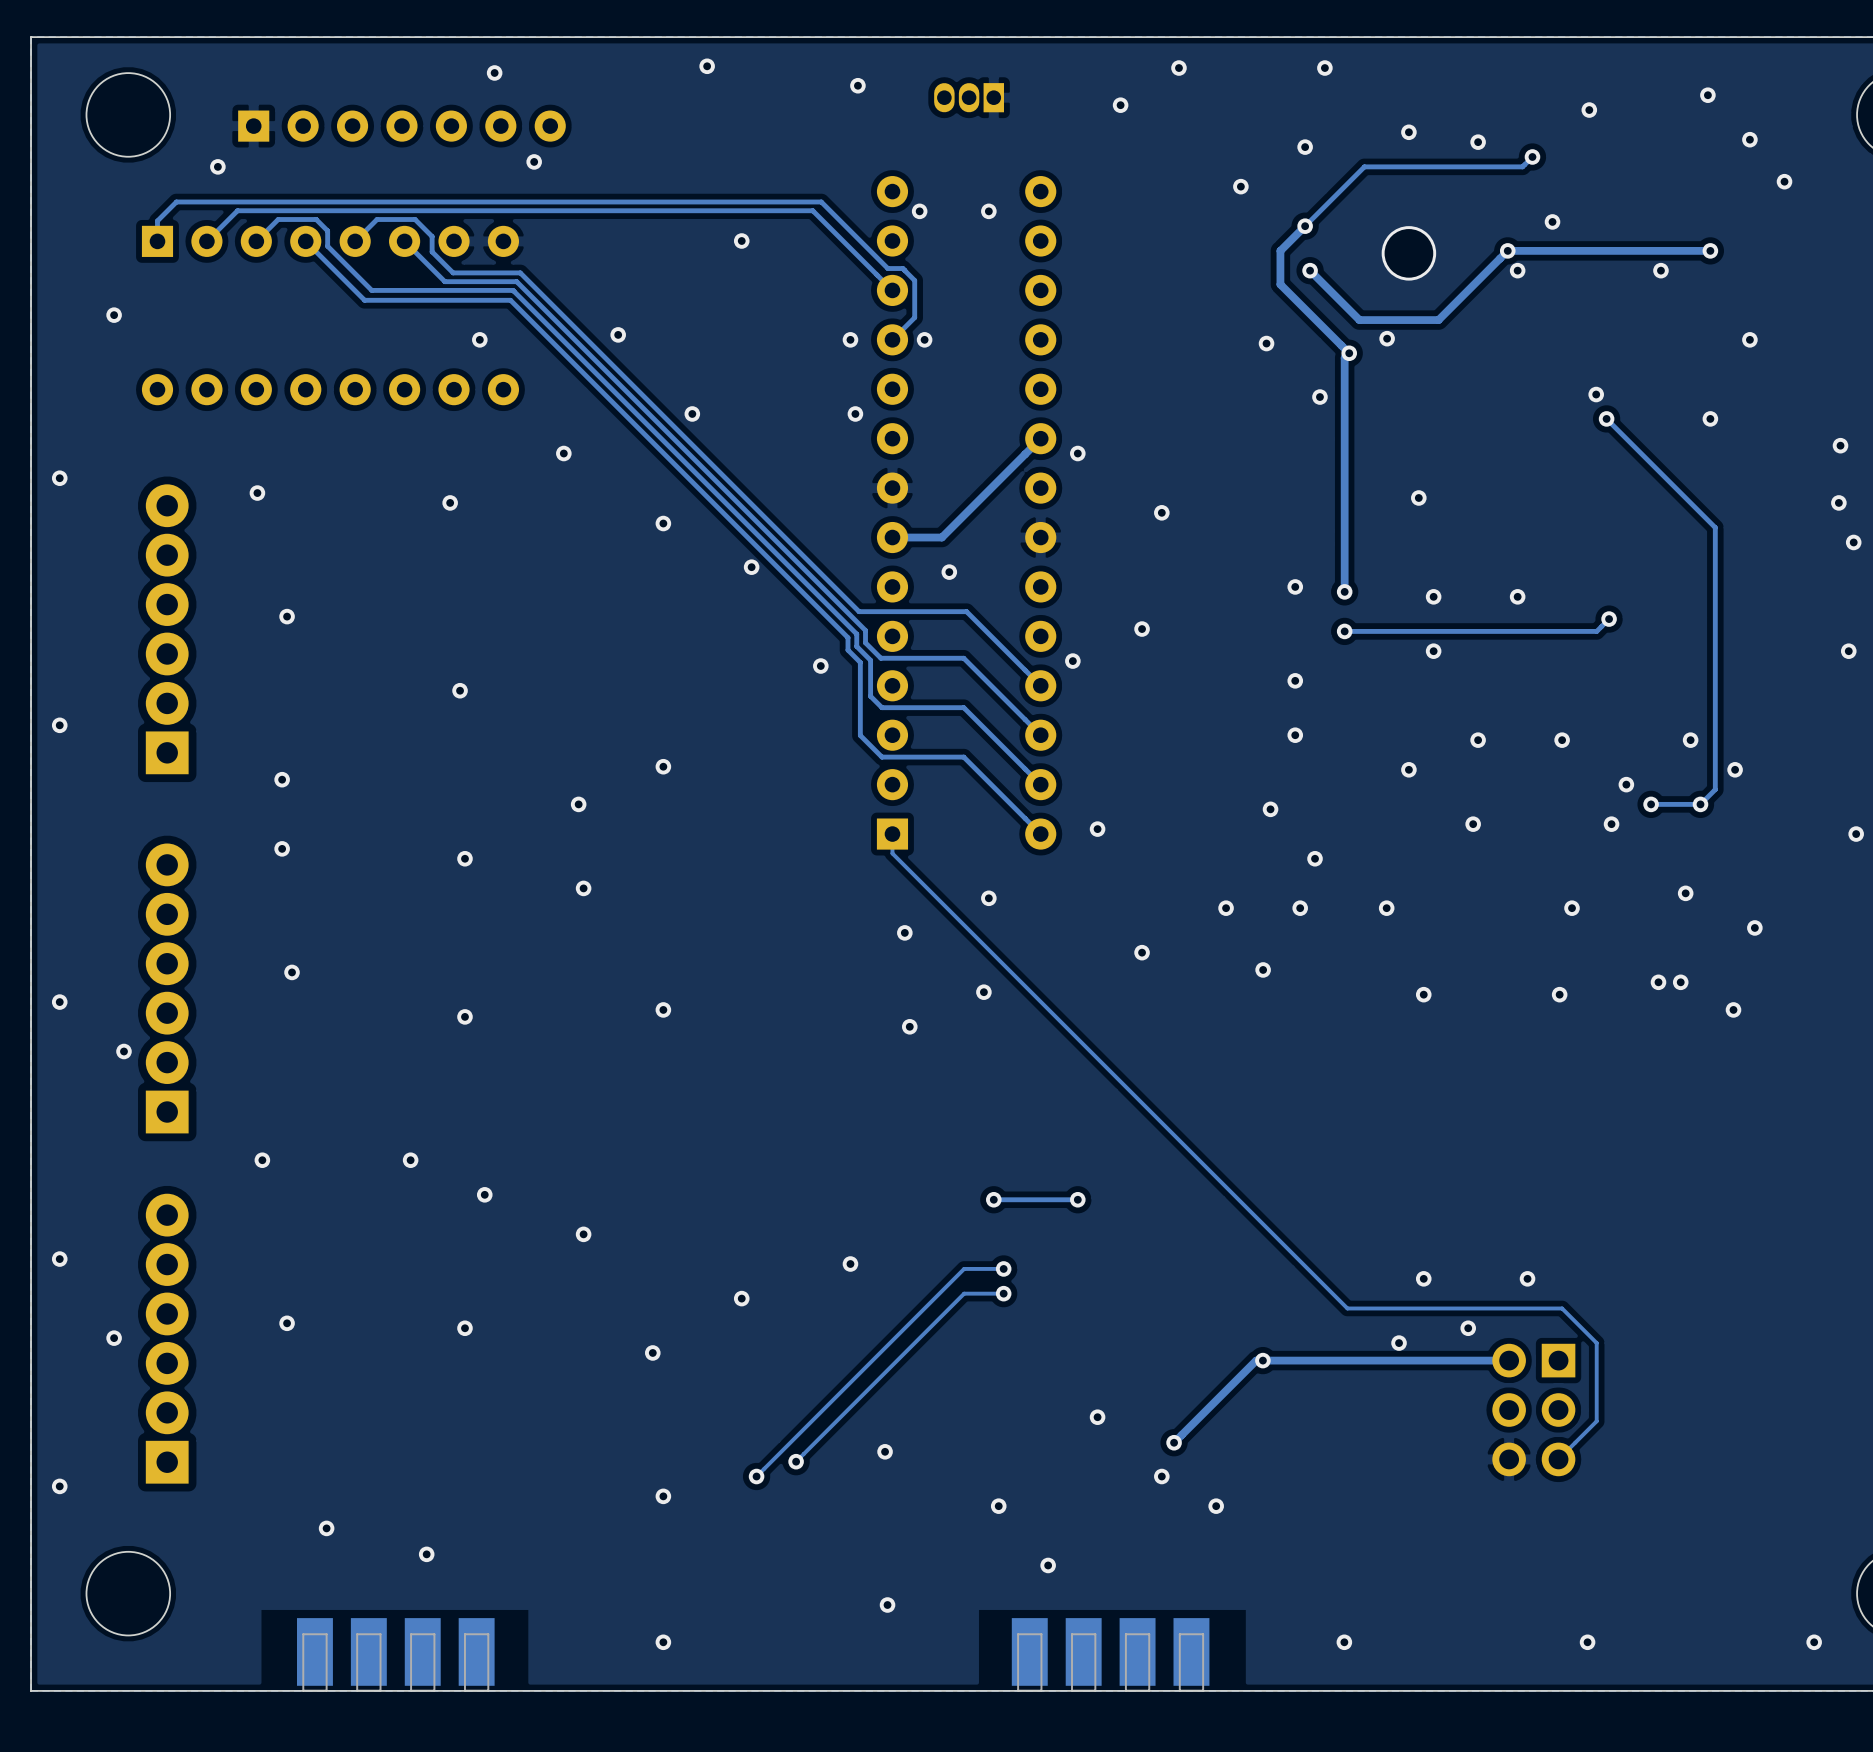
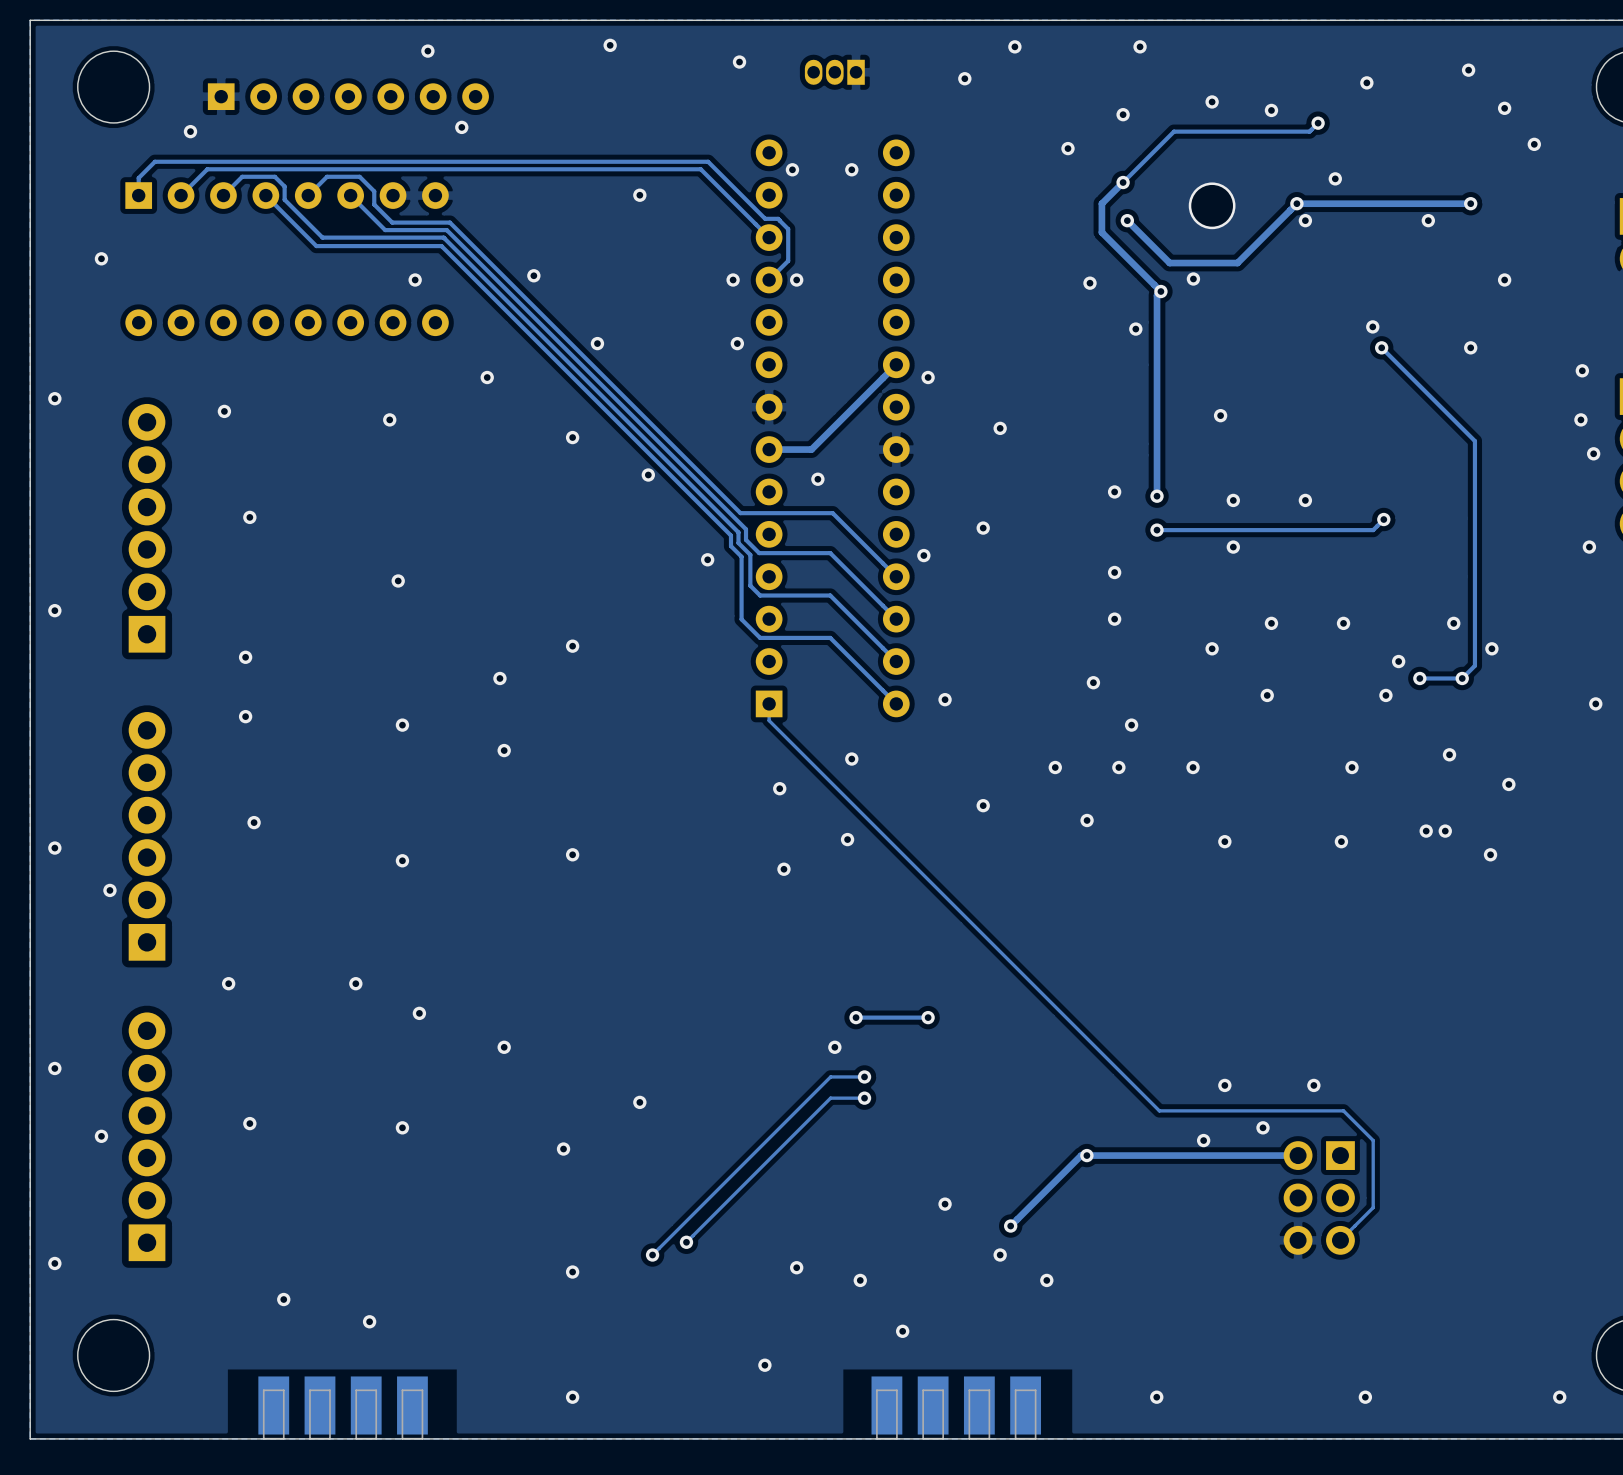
via: none -> (834, 1047)
via: (850, 1264) -> none
via position: (885, 1451) -> (796, 1267)

